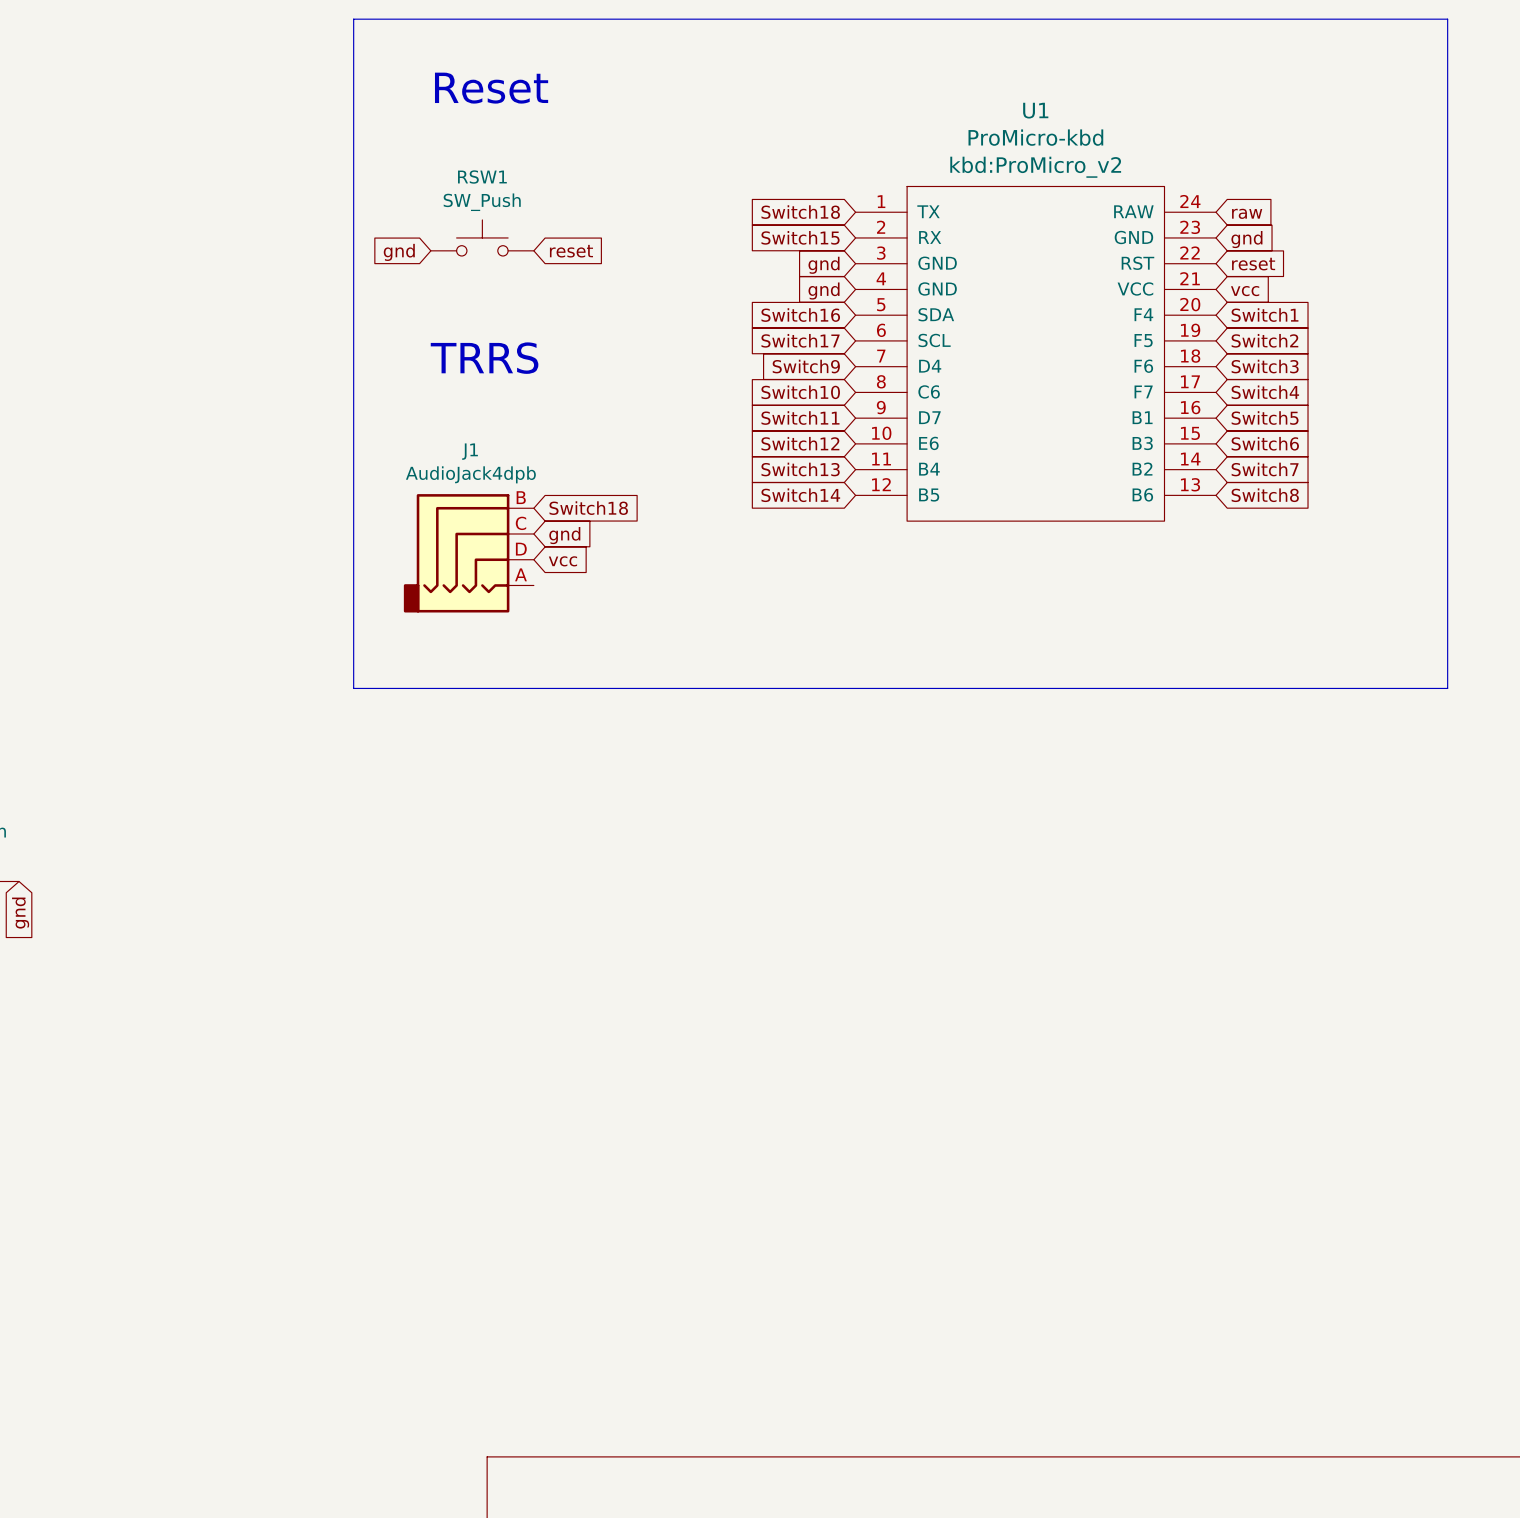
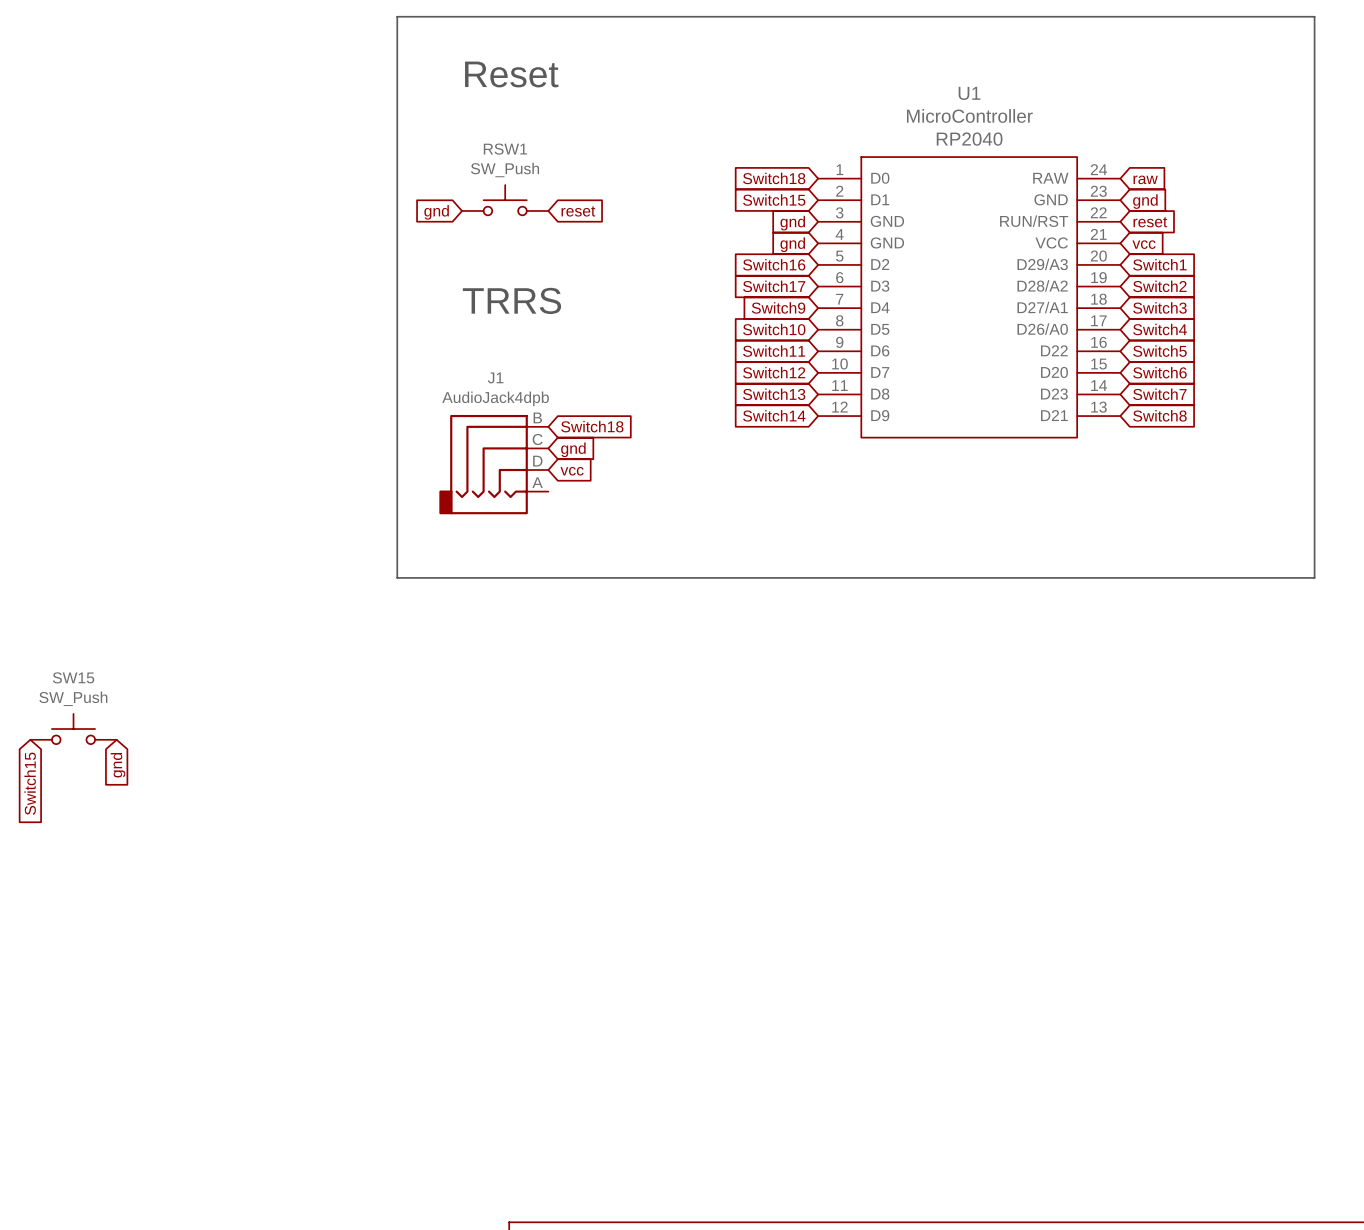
U1 value: ProMicro-kbd (1035, 137) -> MicroController (969, 115)
U1 text: kbd:ProMicro_v2 (1035, 167) -> RP2040 (969, 139)
U1 symbol: [855, 186, 1216, 522] -> [818, 157, 1121, 438]

